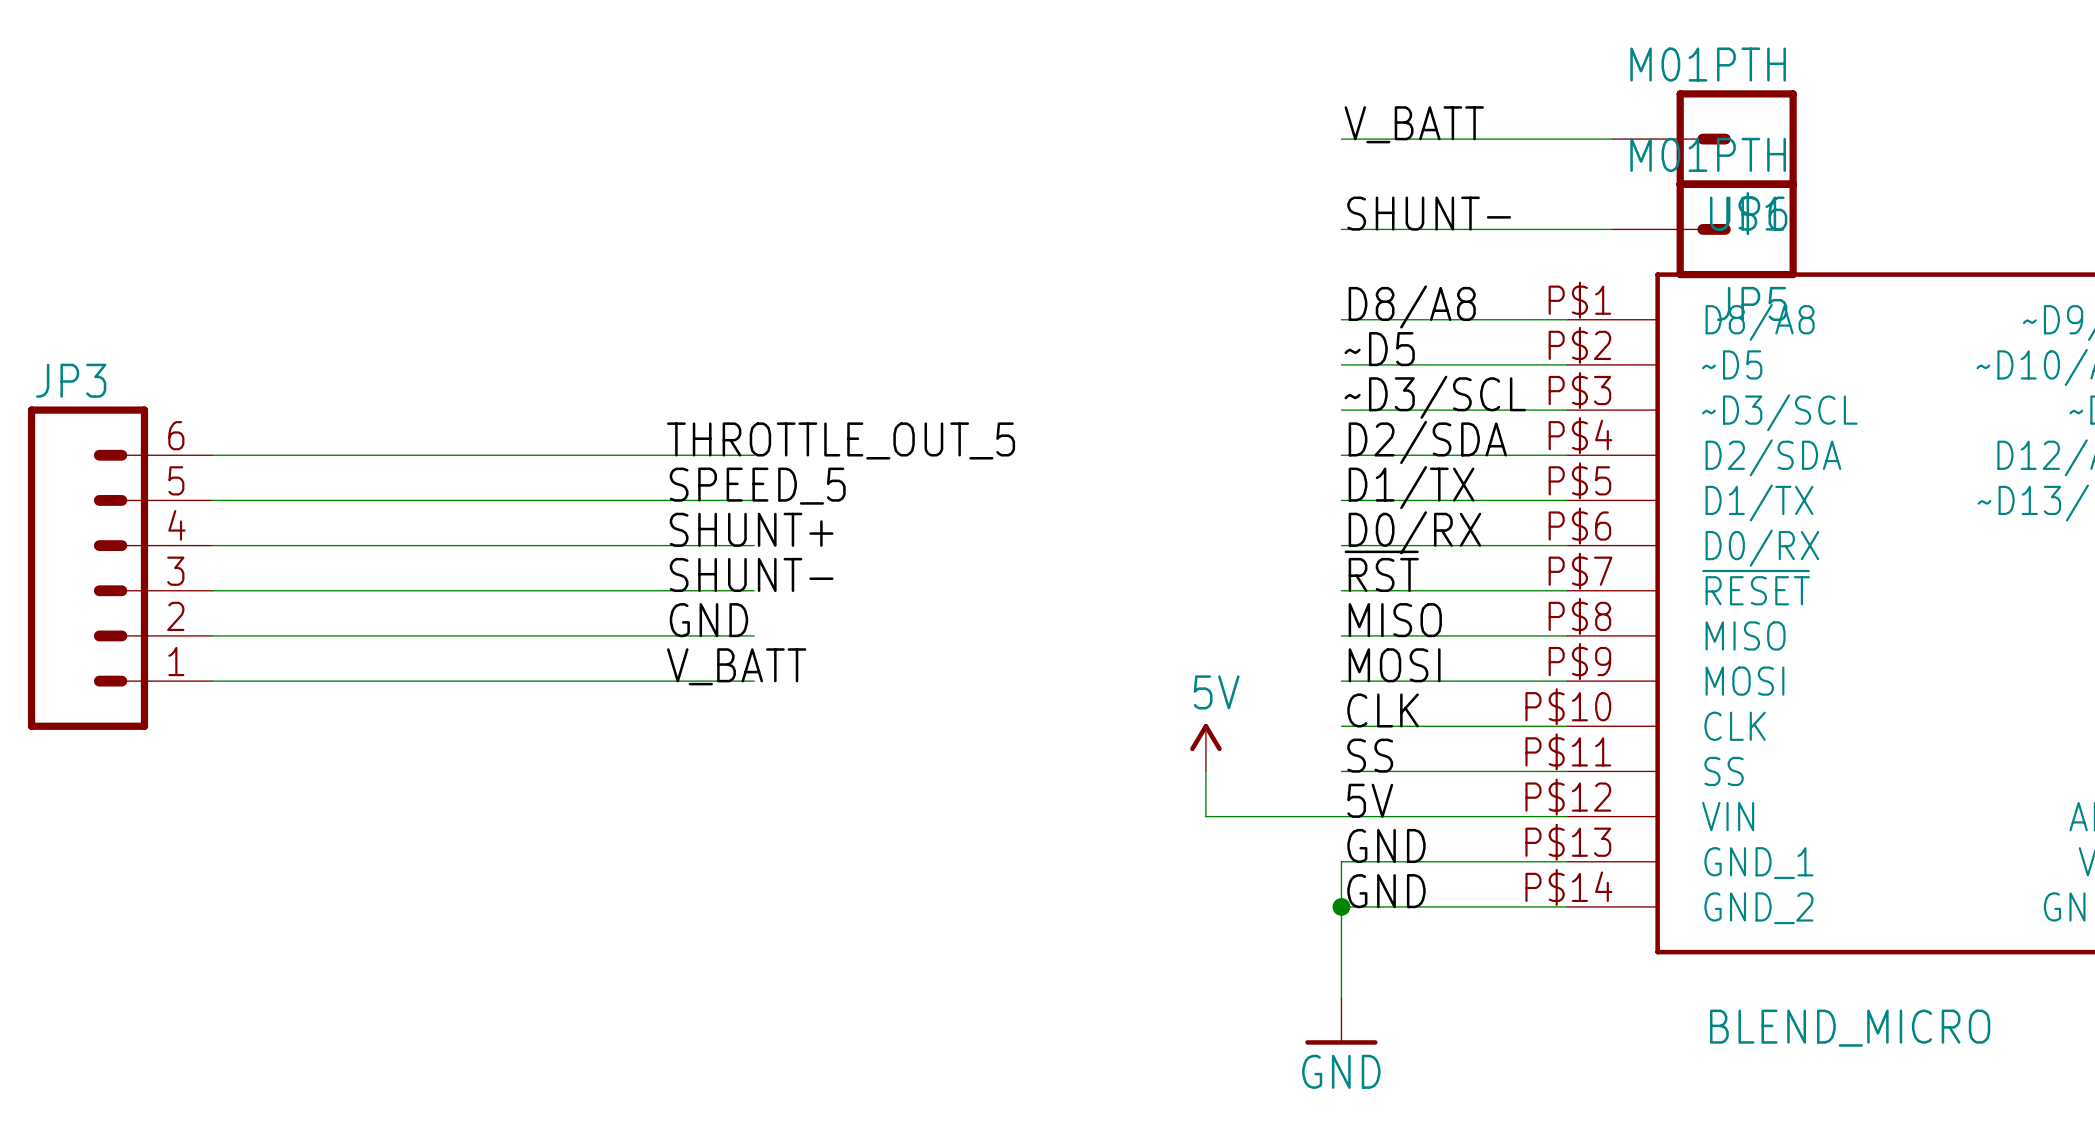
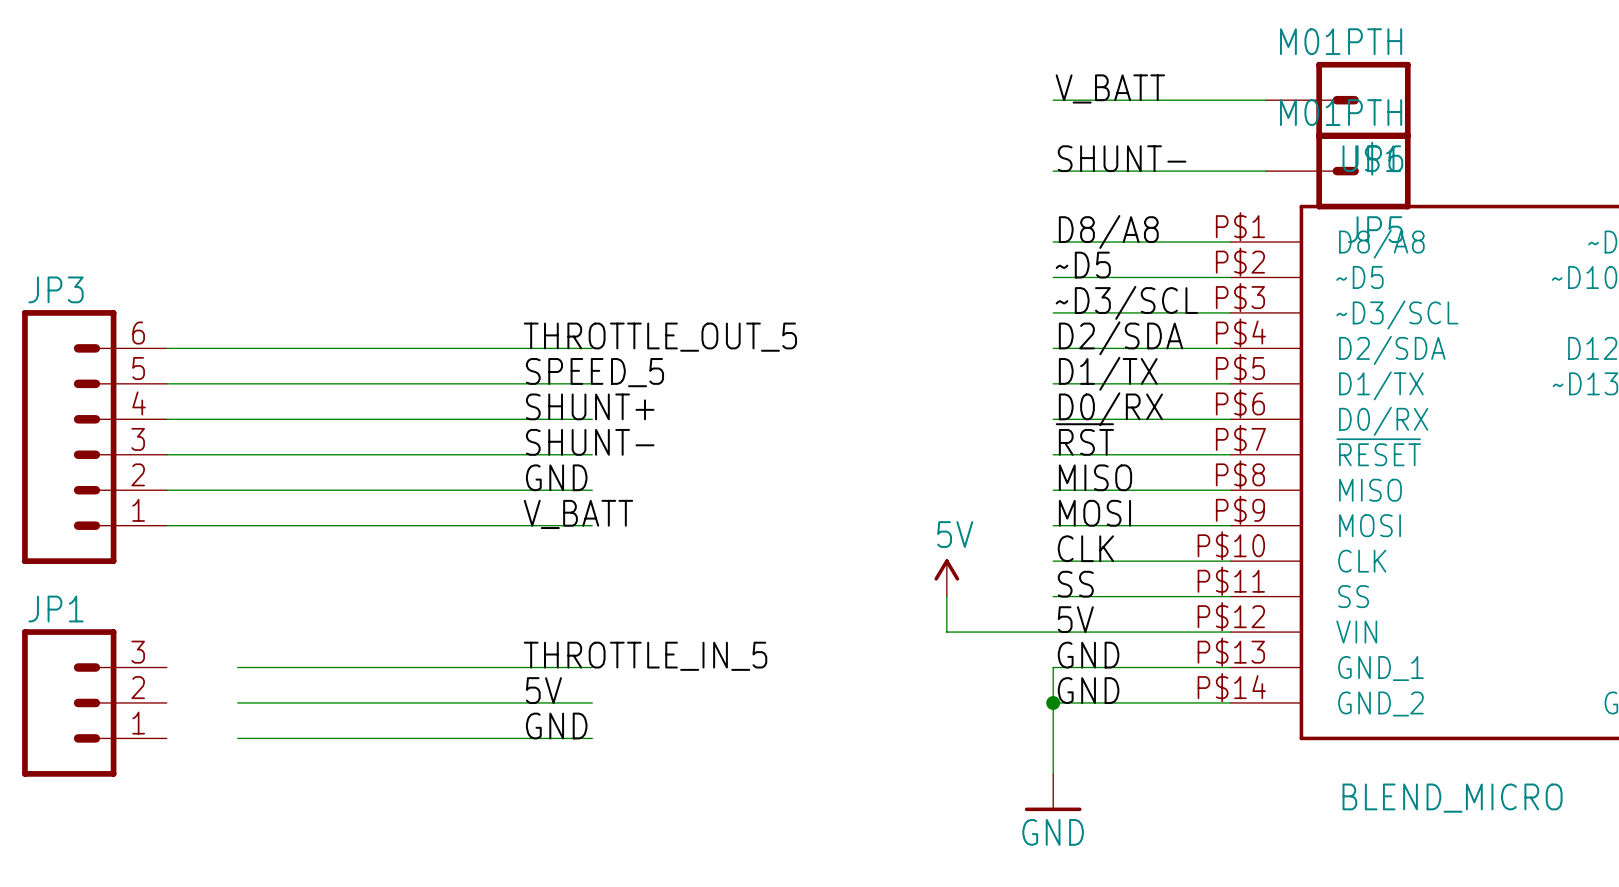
label: none -> THROTTLE_IN_5 (645, 656)
wire: none -> (237, 667) (592, 667)
label: none -> 5V (543, 690)
JP1: none -> (94, 702)
wire: none -> (237, 702) (592, 702)
label: none -> GND (556, 726)
wire: none -> (237, 738) (592, 738)

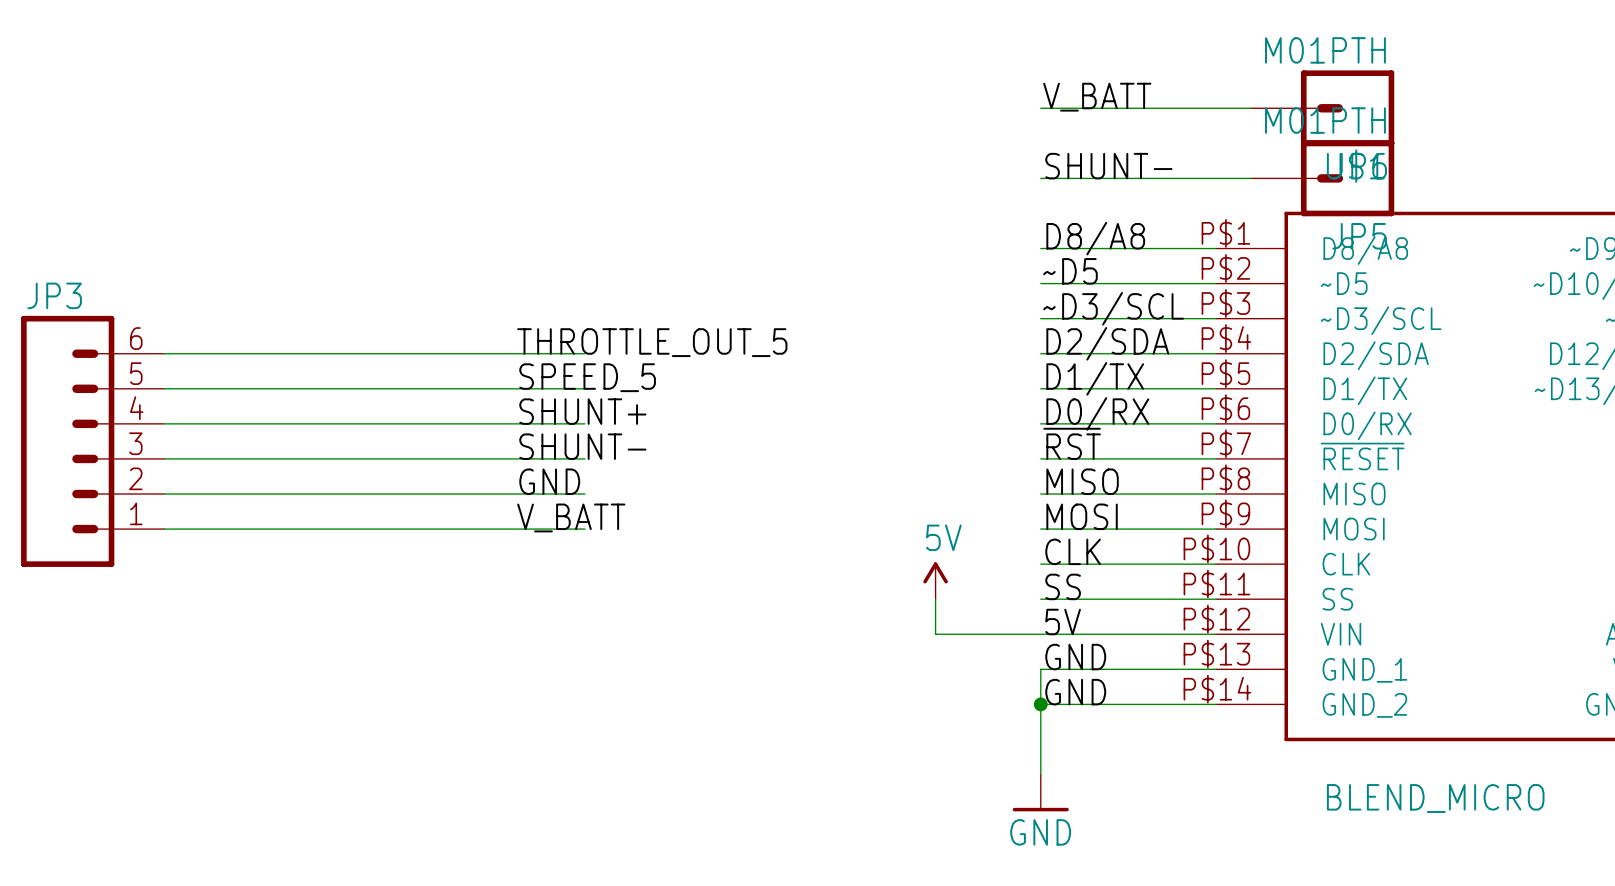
label: THROTTLE_IN_5 (645, 656) -> none
wire: (237, 667) (592, 667) -> none
label: 5V (543, 690) -> none
JP1: (94, 702) -> none
wire: (237, 702) (592, 702) -> none
label: GND (556, 726) -> none
wire: (237, 738) (592, 738) -> none

